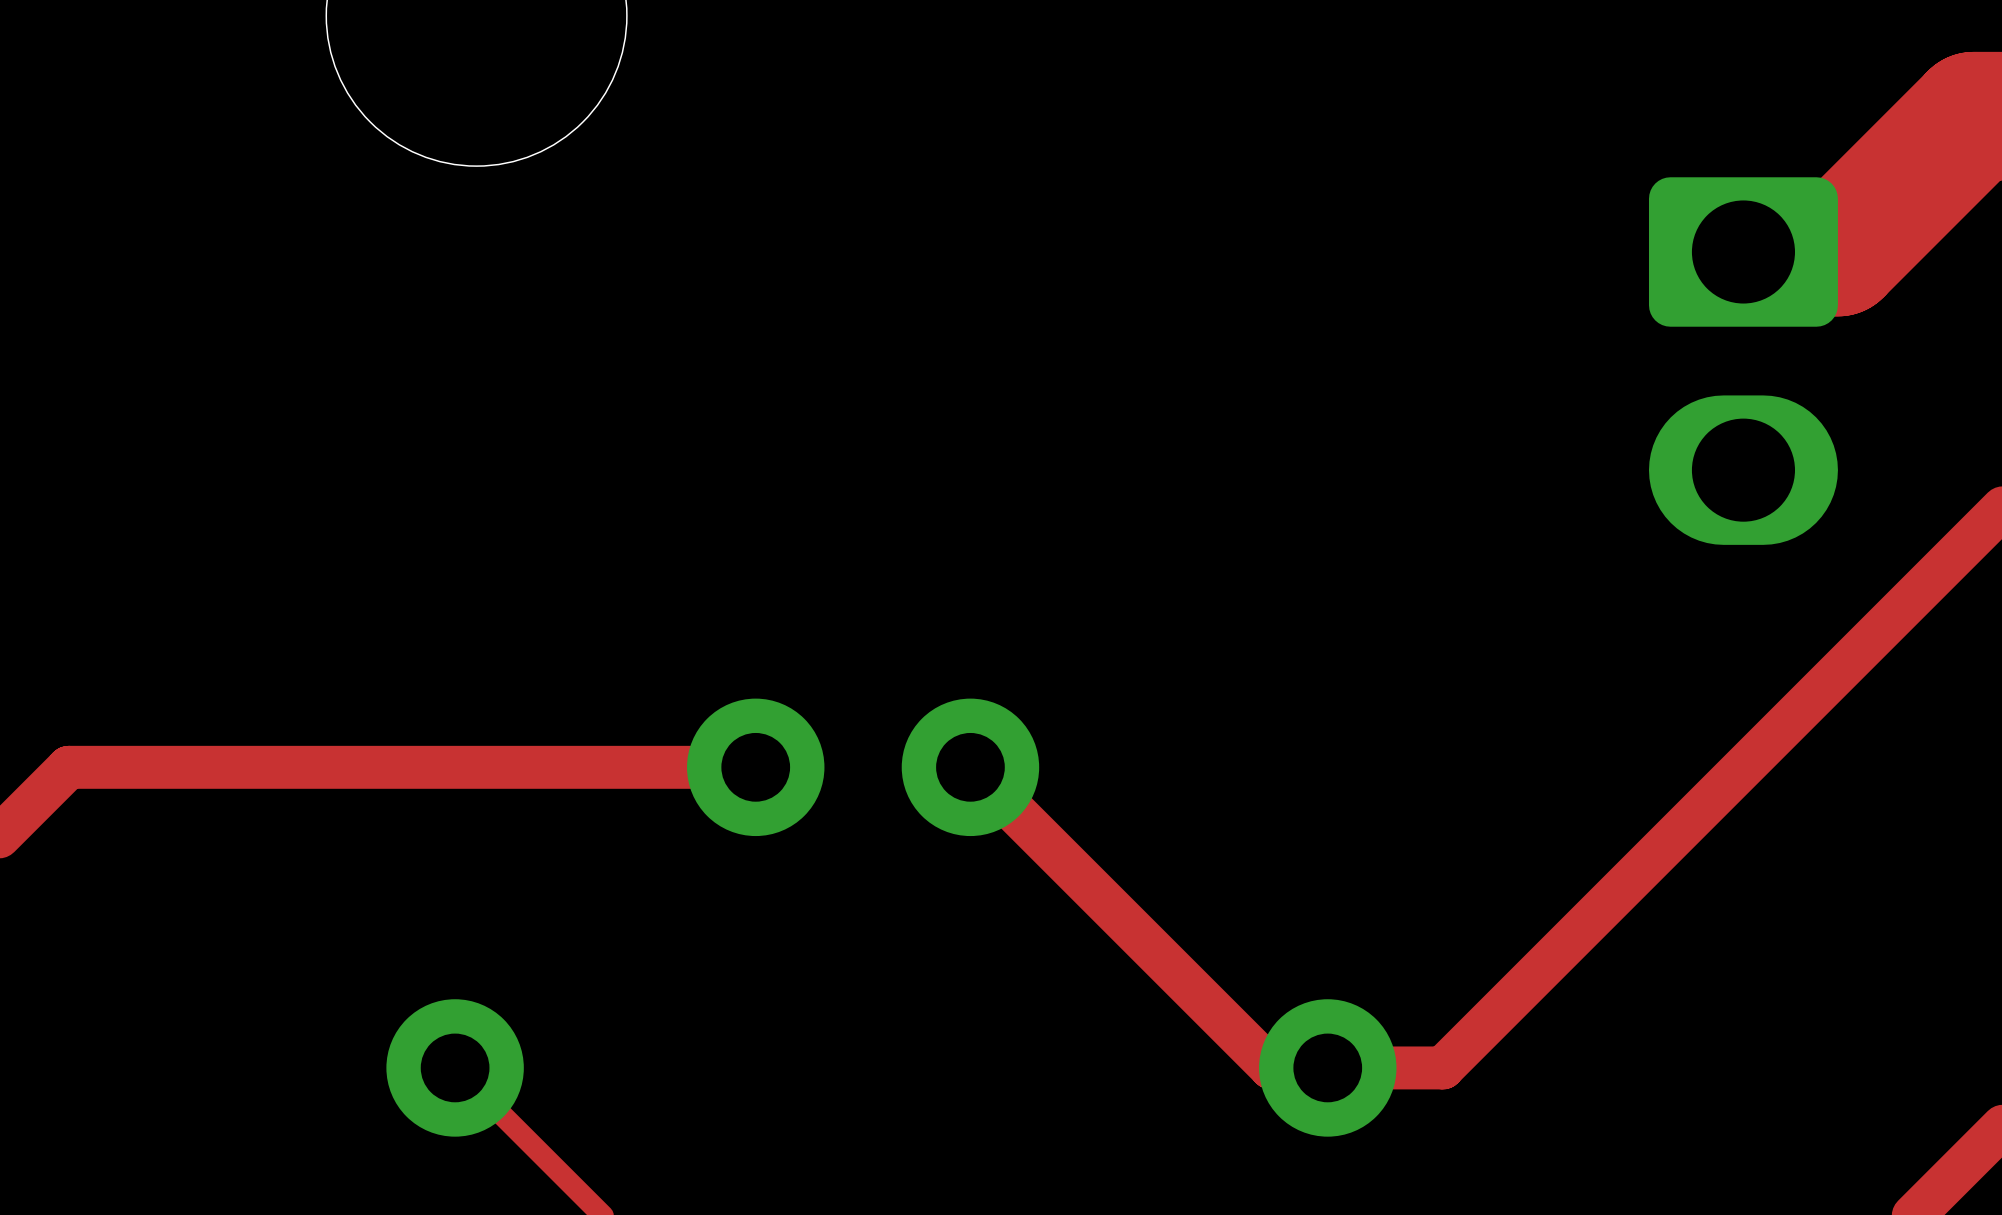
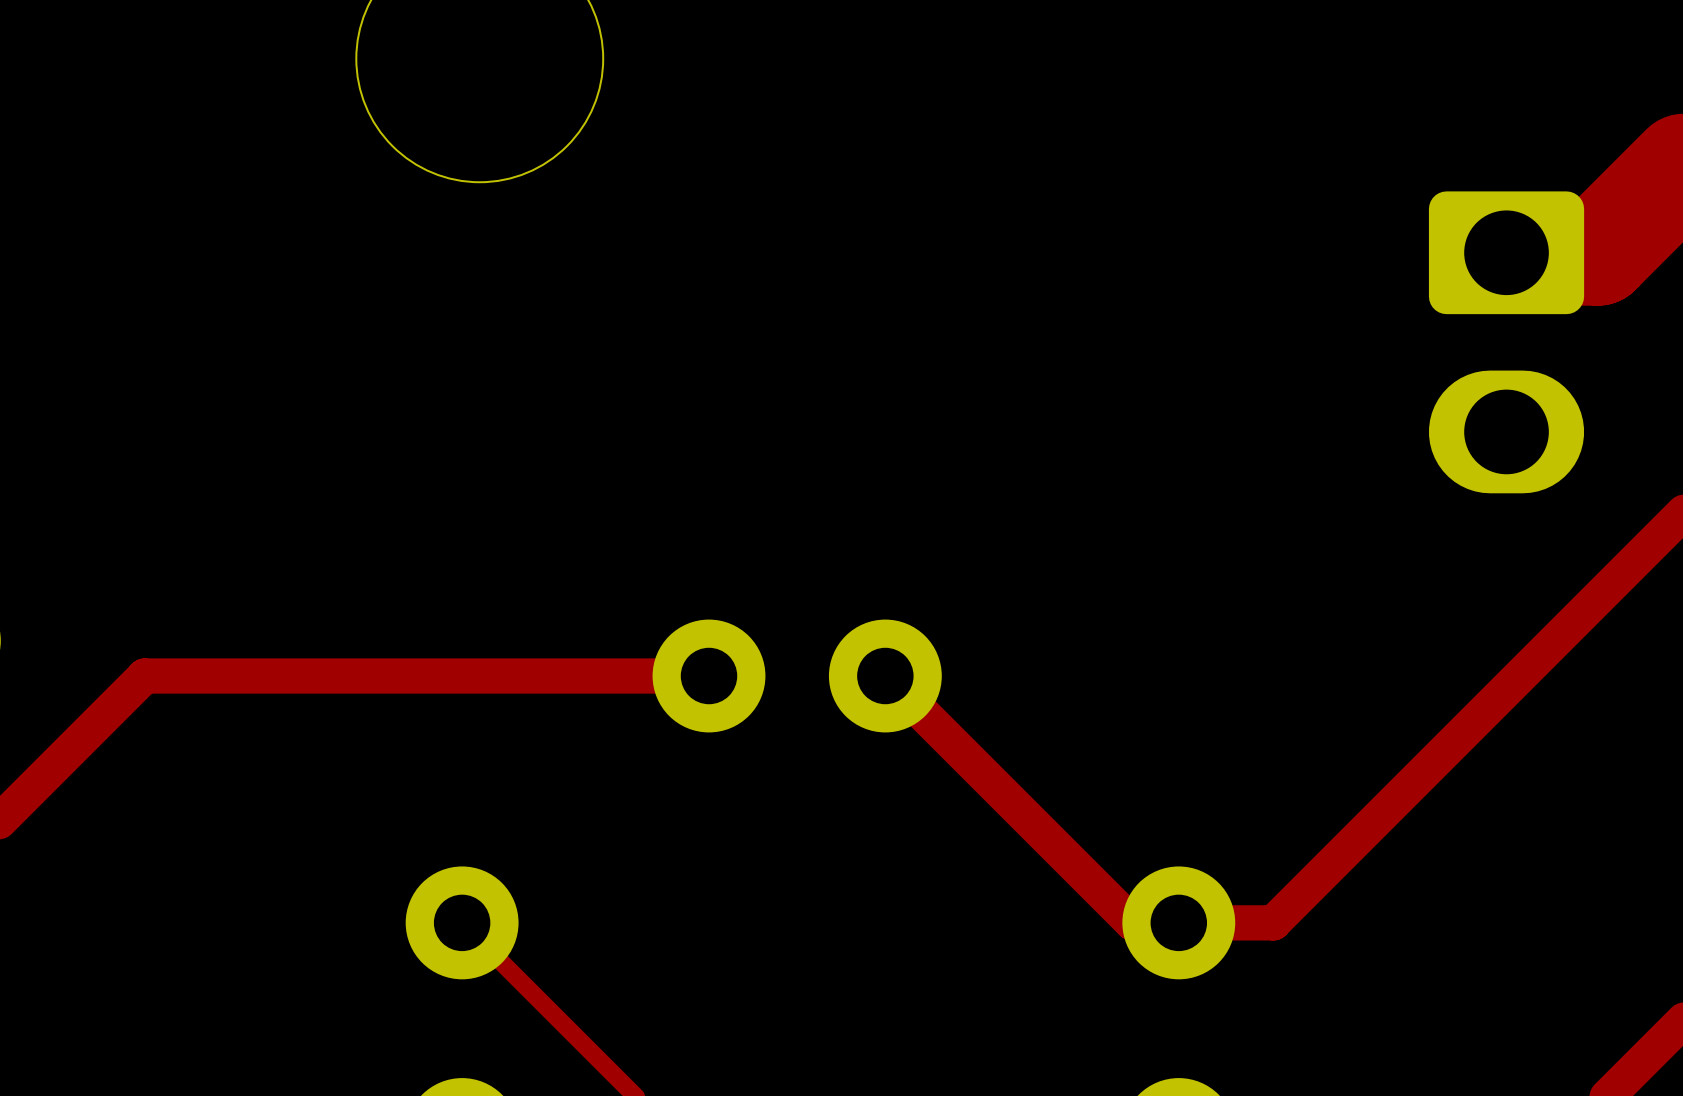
part position: (1743, 361) -> (1506, 342)

